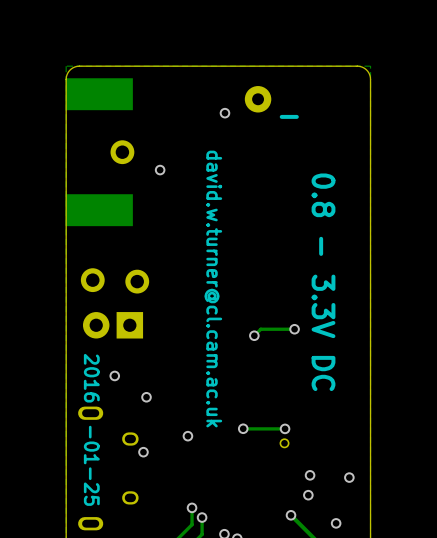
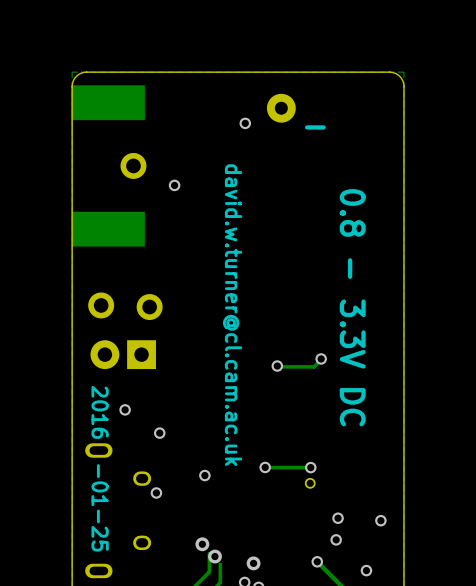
track: none -> (322, 358) (314, 366) (275, 366)
track: (294, 329) (260, 329) (254, 335) -> none
via: none -> (202, 544)
via: (192, 507) -> none
via: none -> (214, 556)
via: none -> (253, 563)
via: (202, 517) -> none

